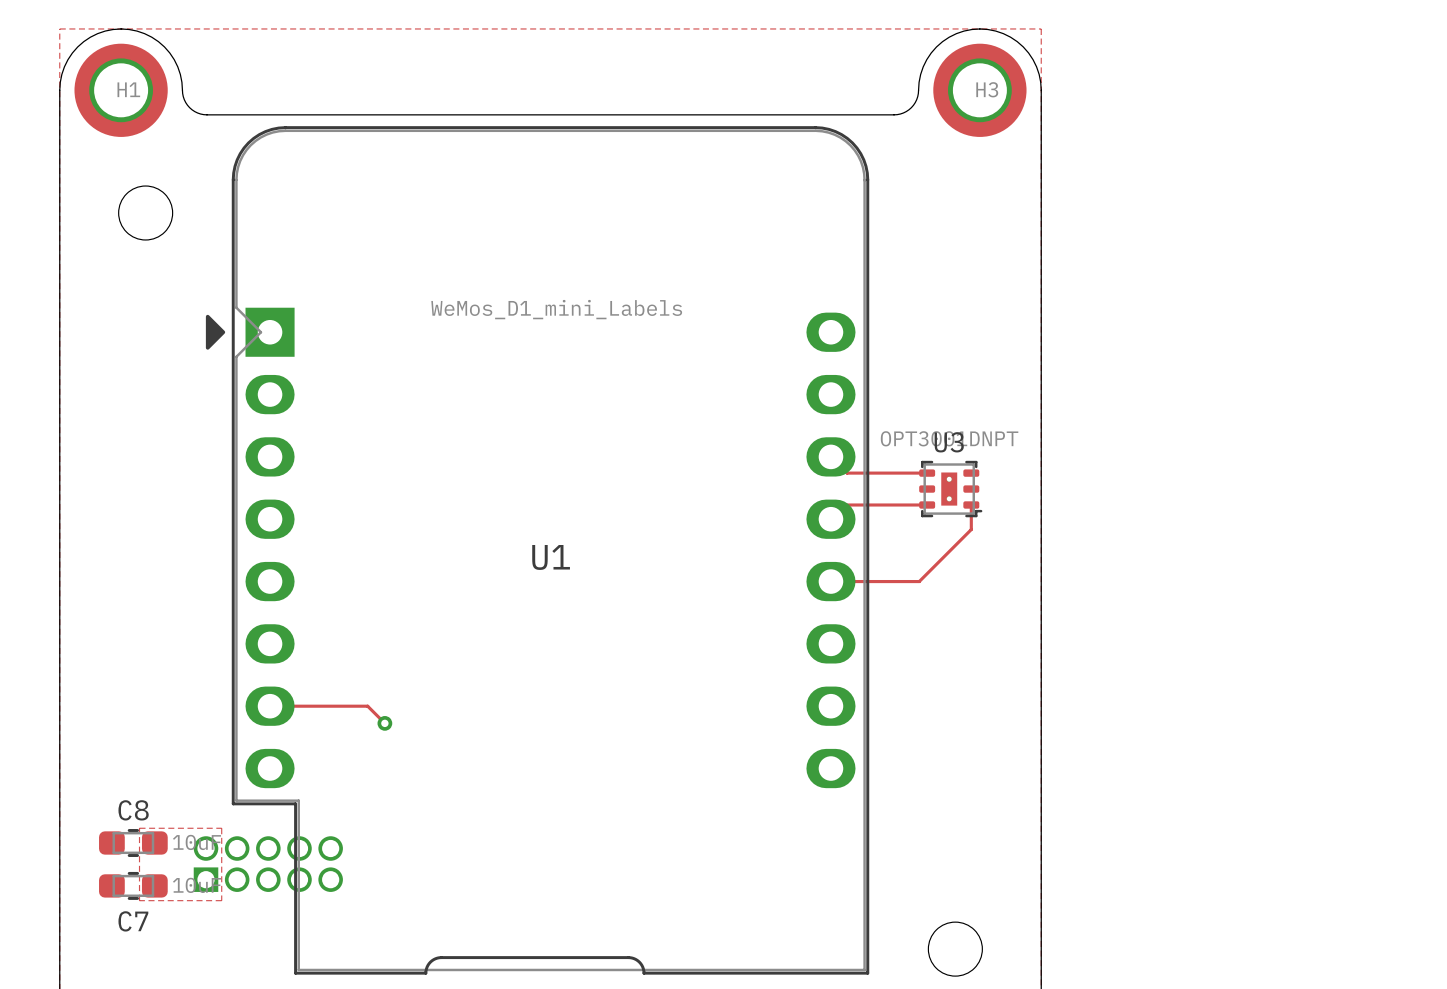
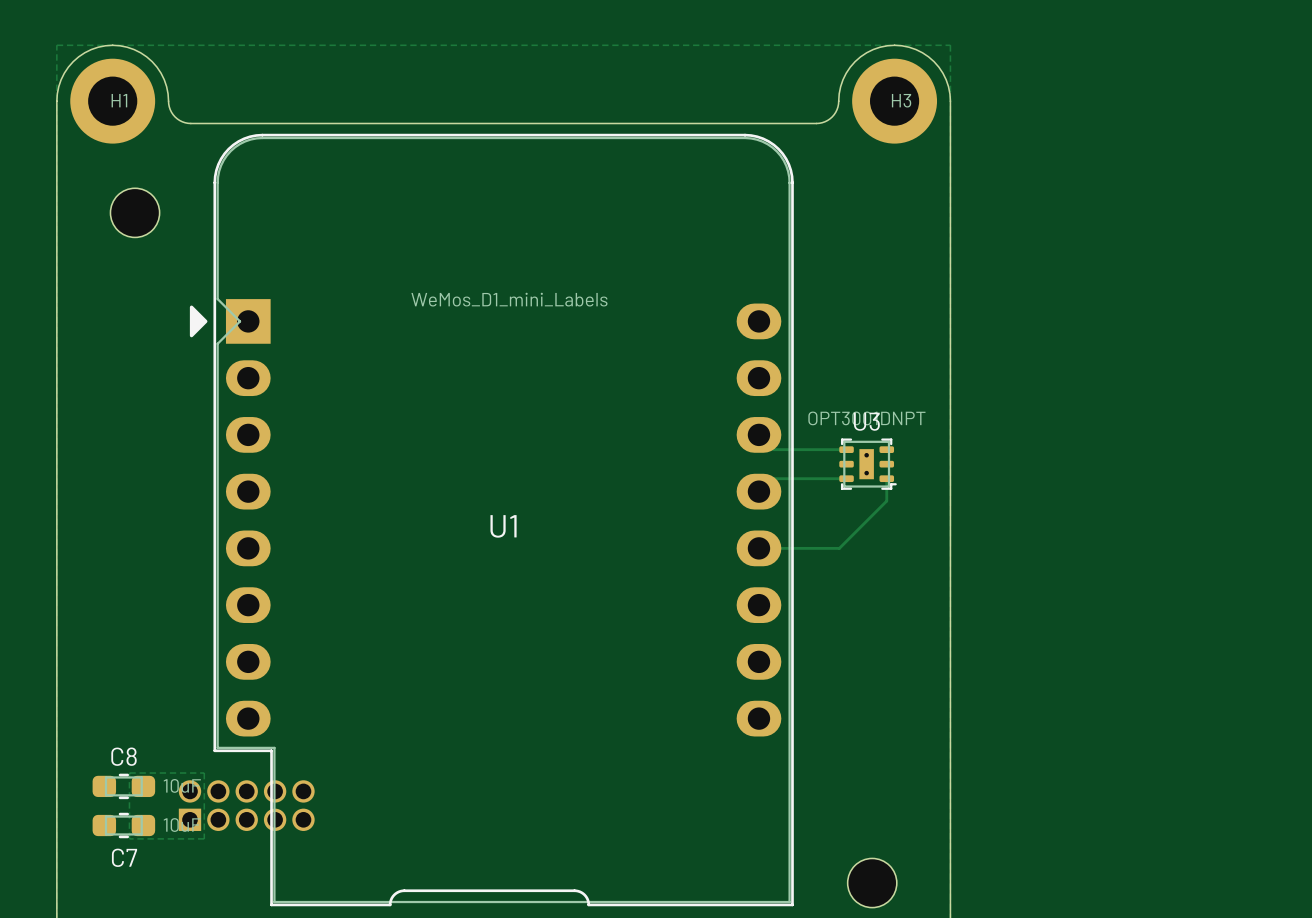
track: (270, 706) (367, 706) (384, 723) -> none
via: (384, 723) -> none

